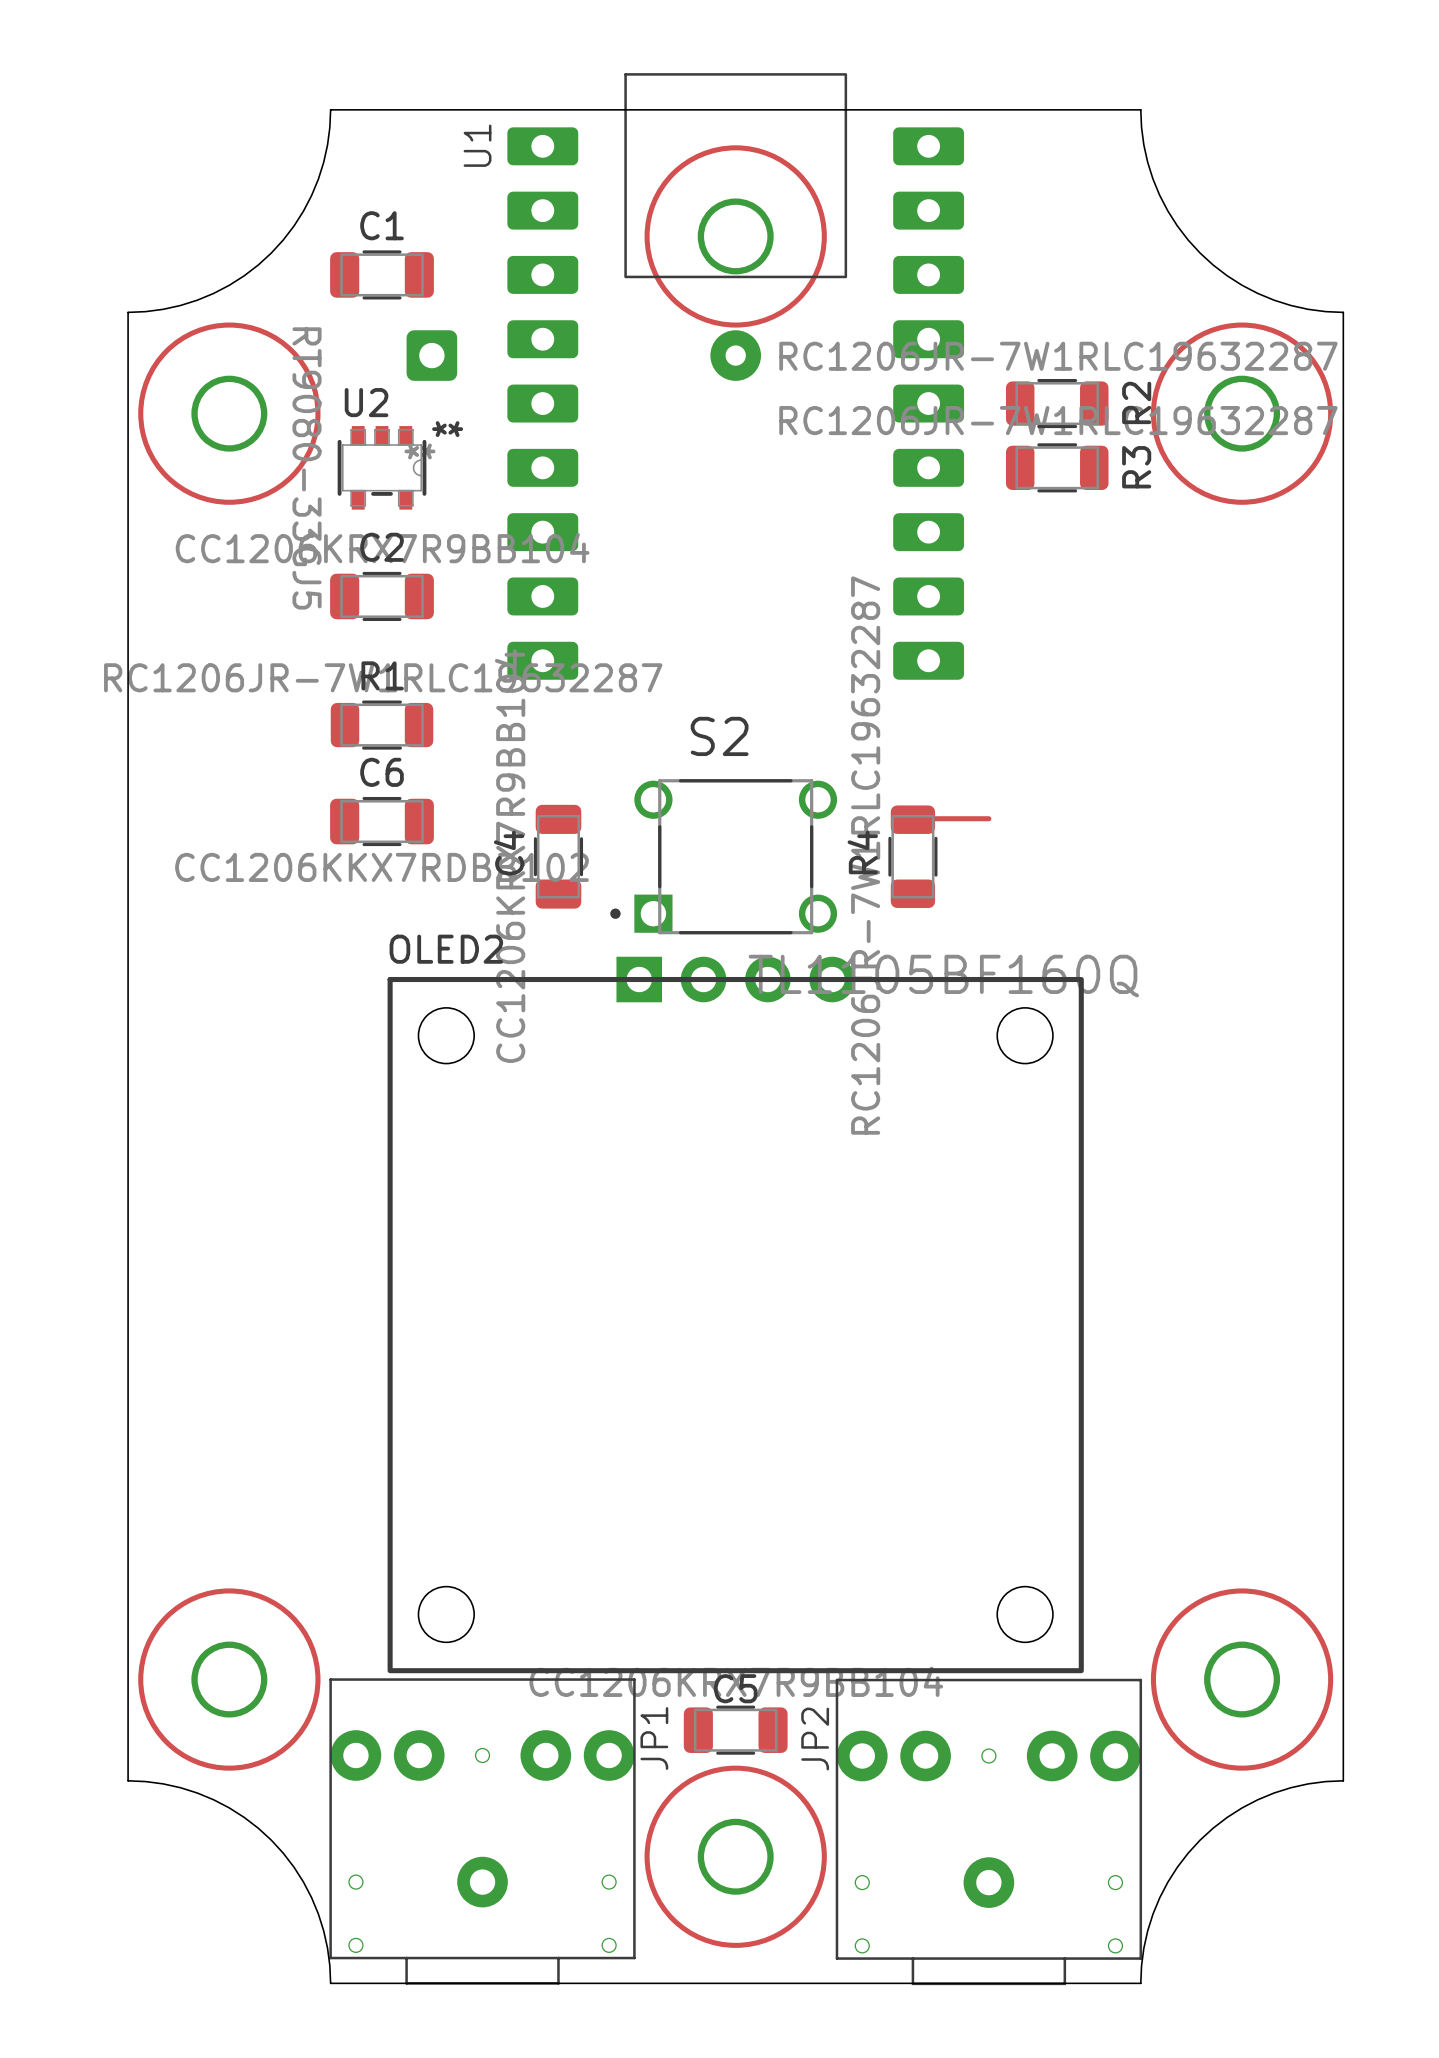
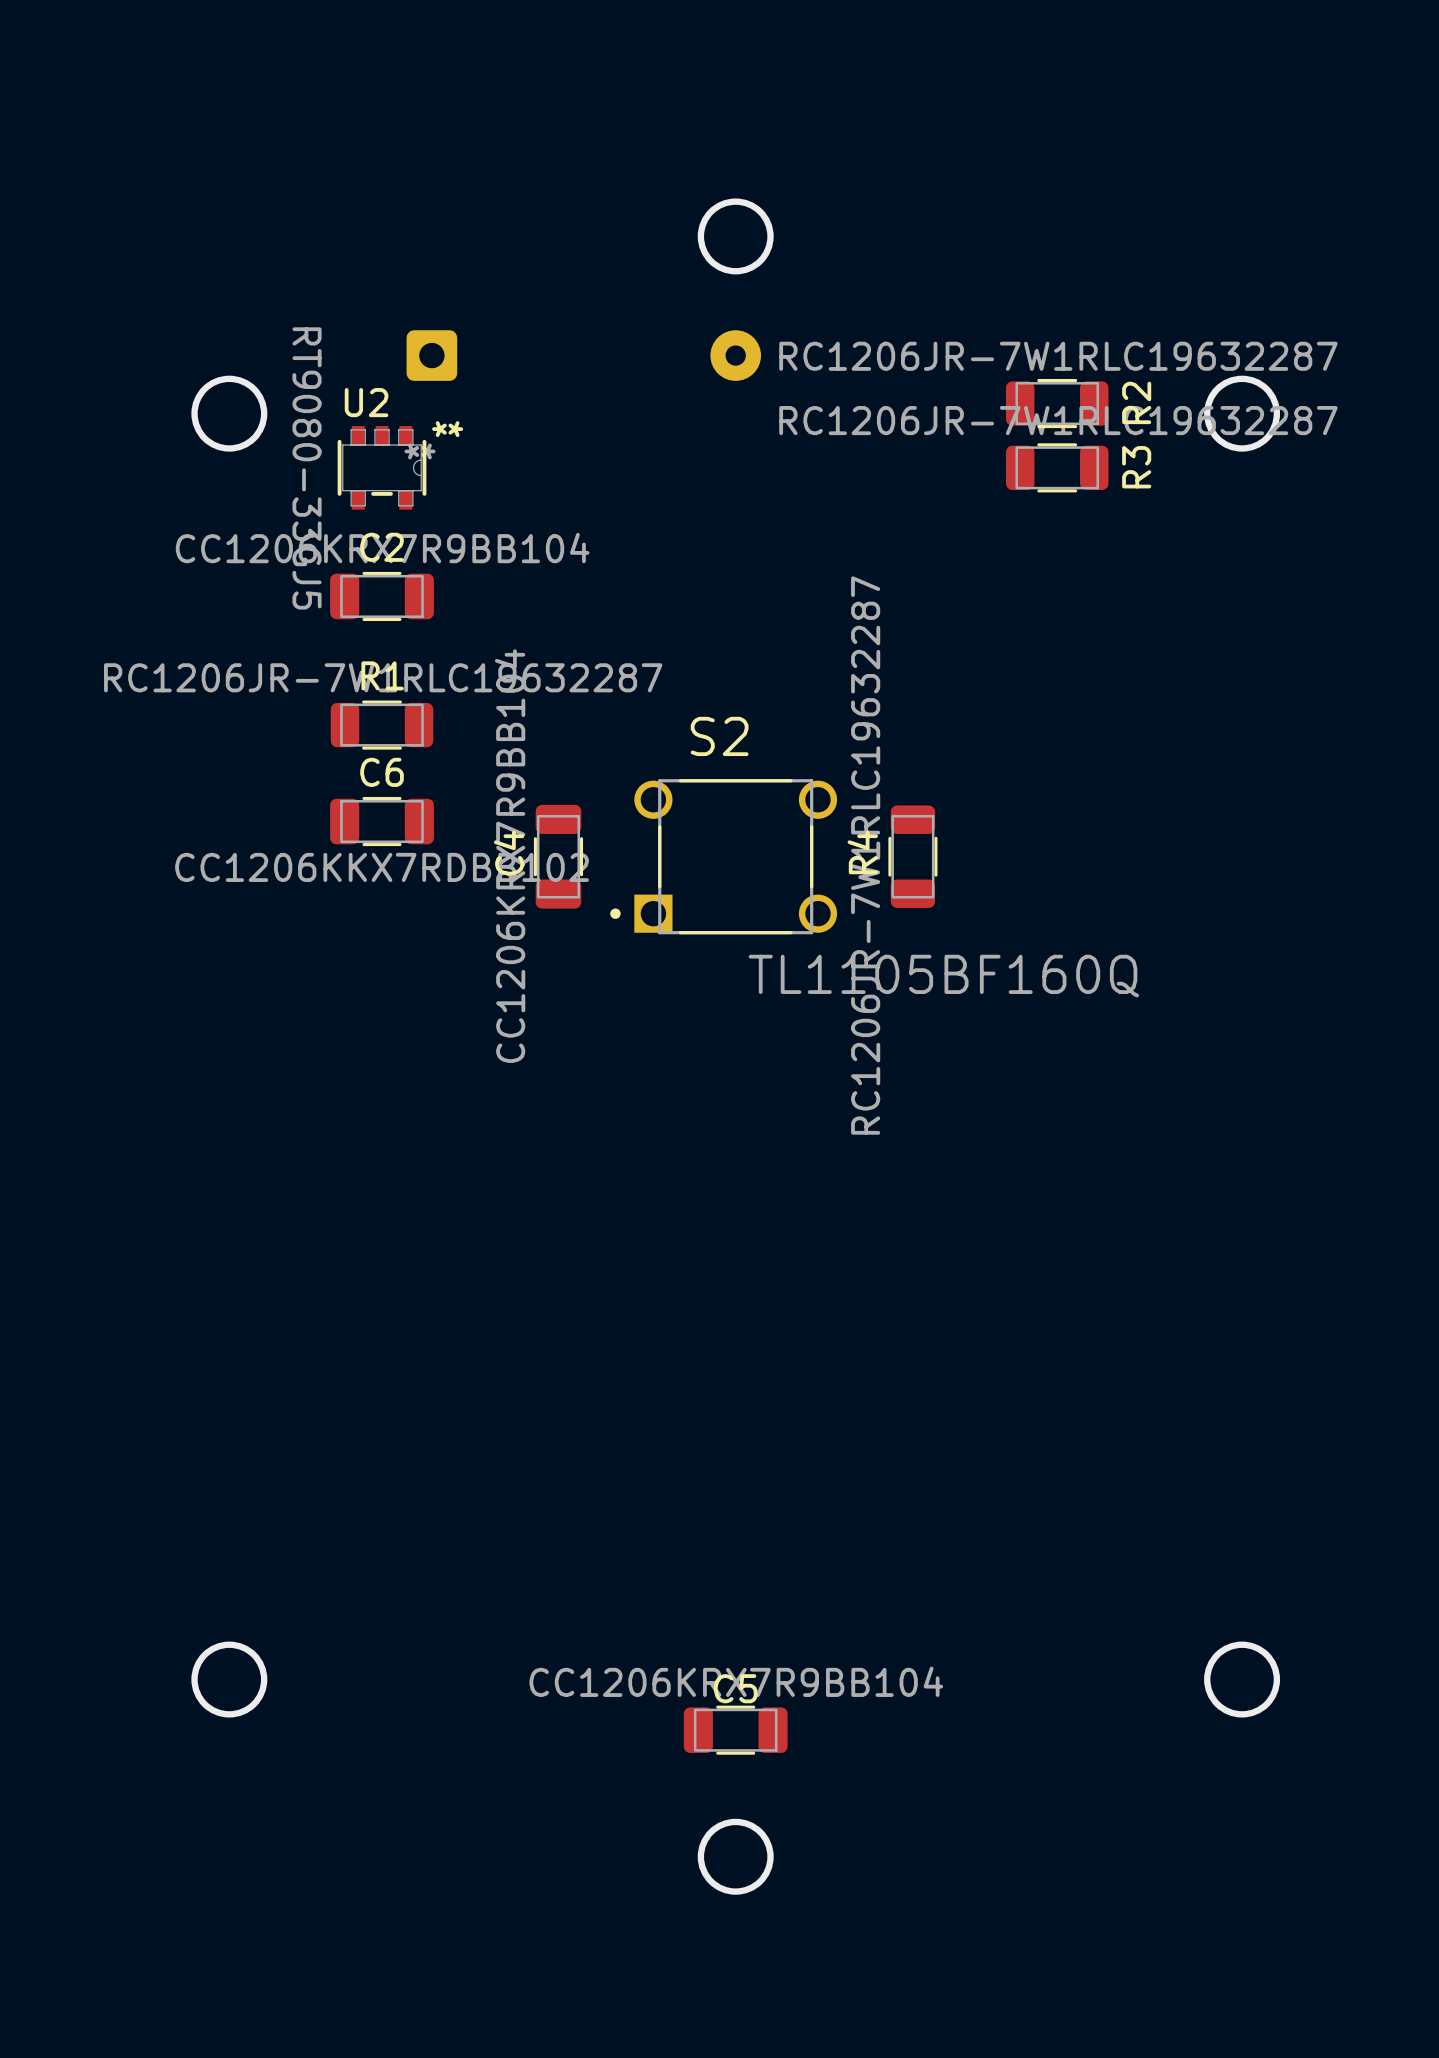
board edge: (330, 109) (1140, 109) (1143, 145) (1147, 162) (1159, 195) (1177, 226) (1200, 253) (1227, 275) (1242, 285) (1274, 300) (1308, 309) (1343, 312) (1343, 1780) (1308, 1783) (1274, 1793) (1242, 1807) (1227, 1817) (1200, 1840) (1177, 1867) (1159, 1897) (1147, 1930) (1143, 1948) (1140, 1983) (330, 1983) (327, 1948) (323, 1930) (311, 1897) (293, 1867) (271, 1840) (244, 1817) (229, 1807) (197, 1793) (163, 1783) (128, 1780) (128, 312) (163, 309) (197, 300) (229, 285) (244, 275) (271, 253) (293, 226) (311, 195) (323, 162) (327, 145) (330, 109) -> none
drawing: [644, 145, 827, 328] -> none
C1: (382, 274) -> none
drawing: [138, 322, 321, 505] -> none
drawing: [1150, 322, 1334, 505] -> none
U1: (735, 376) -> none
top track: (912, 818) (988, 818) -> none
OLED2: (735, 1314) -> none
drawing: [138, 1588, 321, 1771] -> none
drawing: [1150, 1588, 1334, 1771] -> none
drawing: [644, 1765, 827, 1948] -> none
JP1: (482, 1831) -> none
JP2: (988, 1831) -> none

